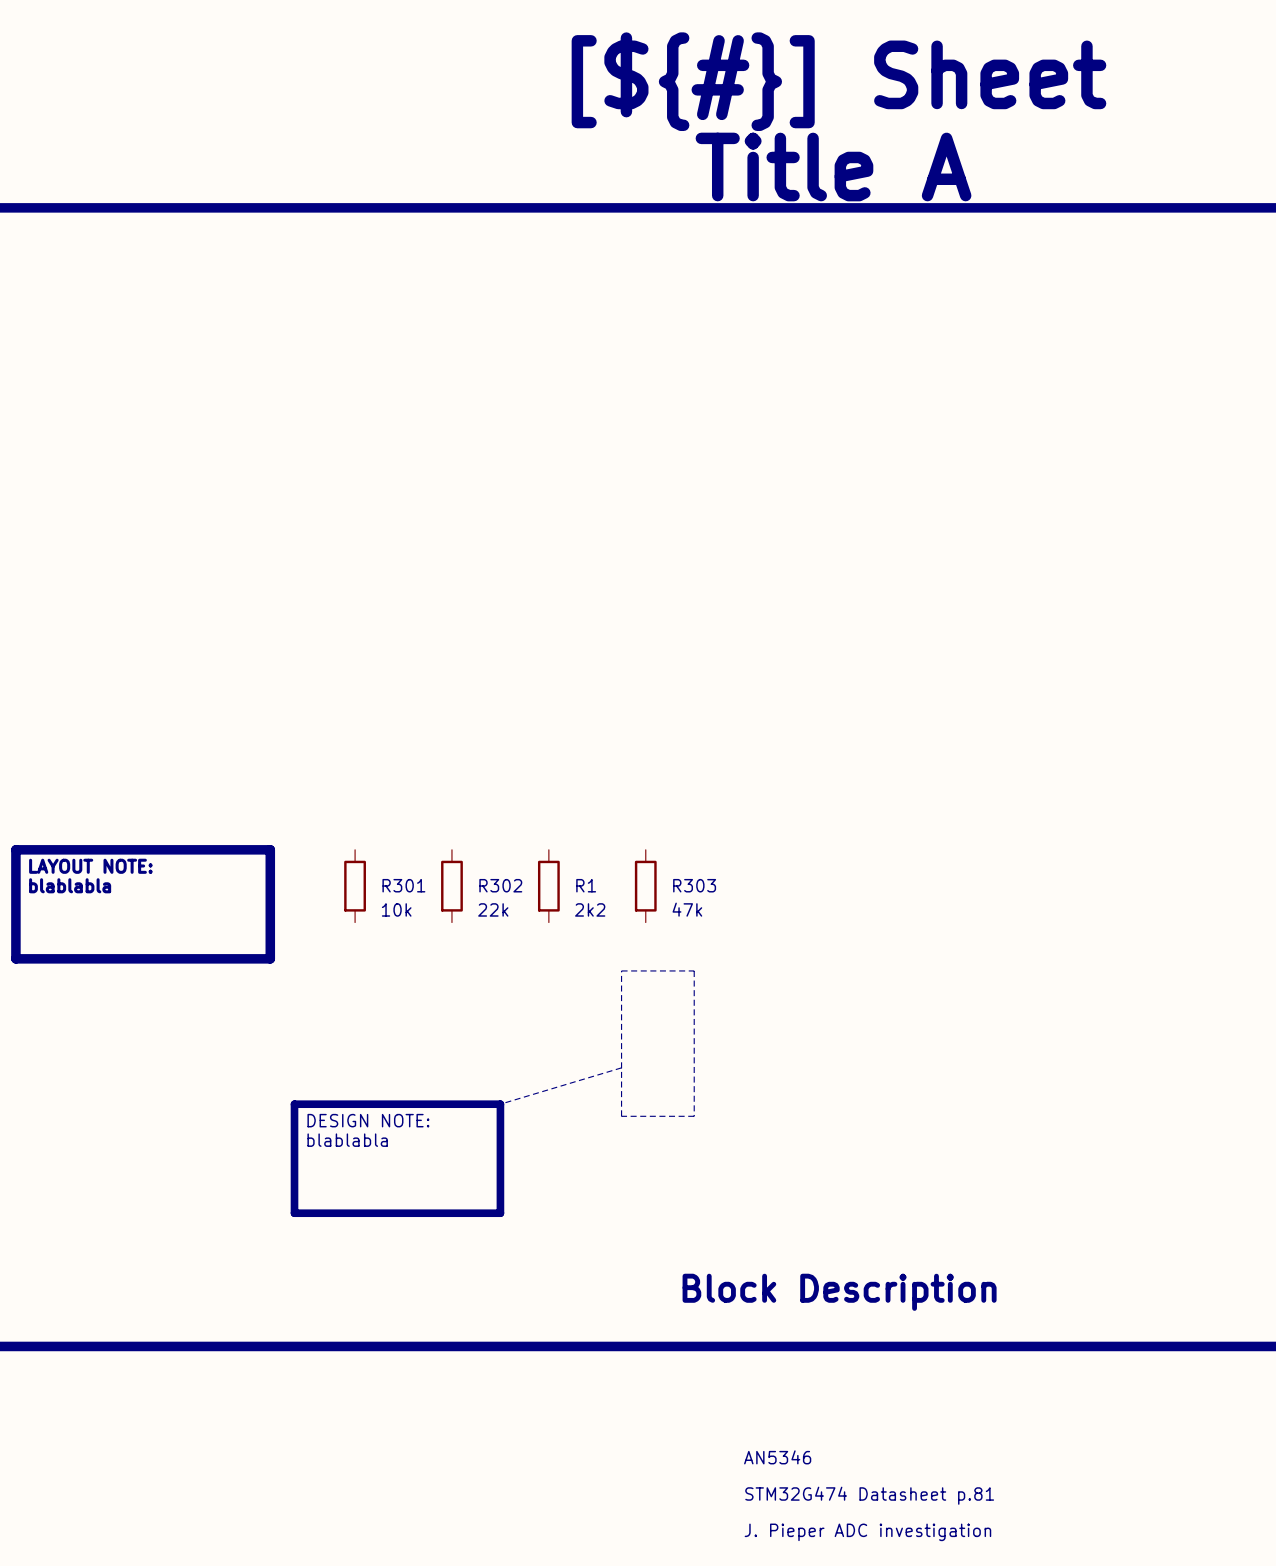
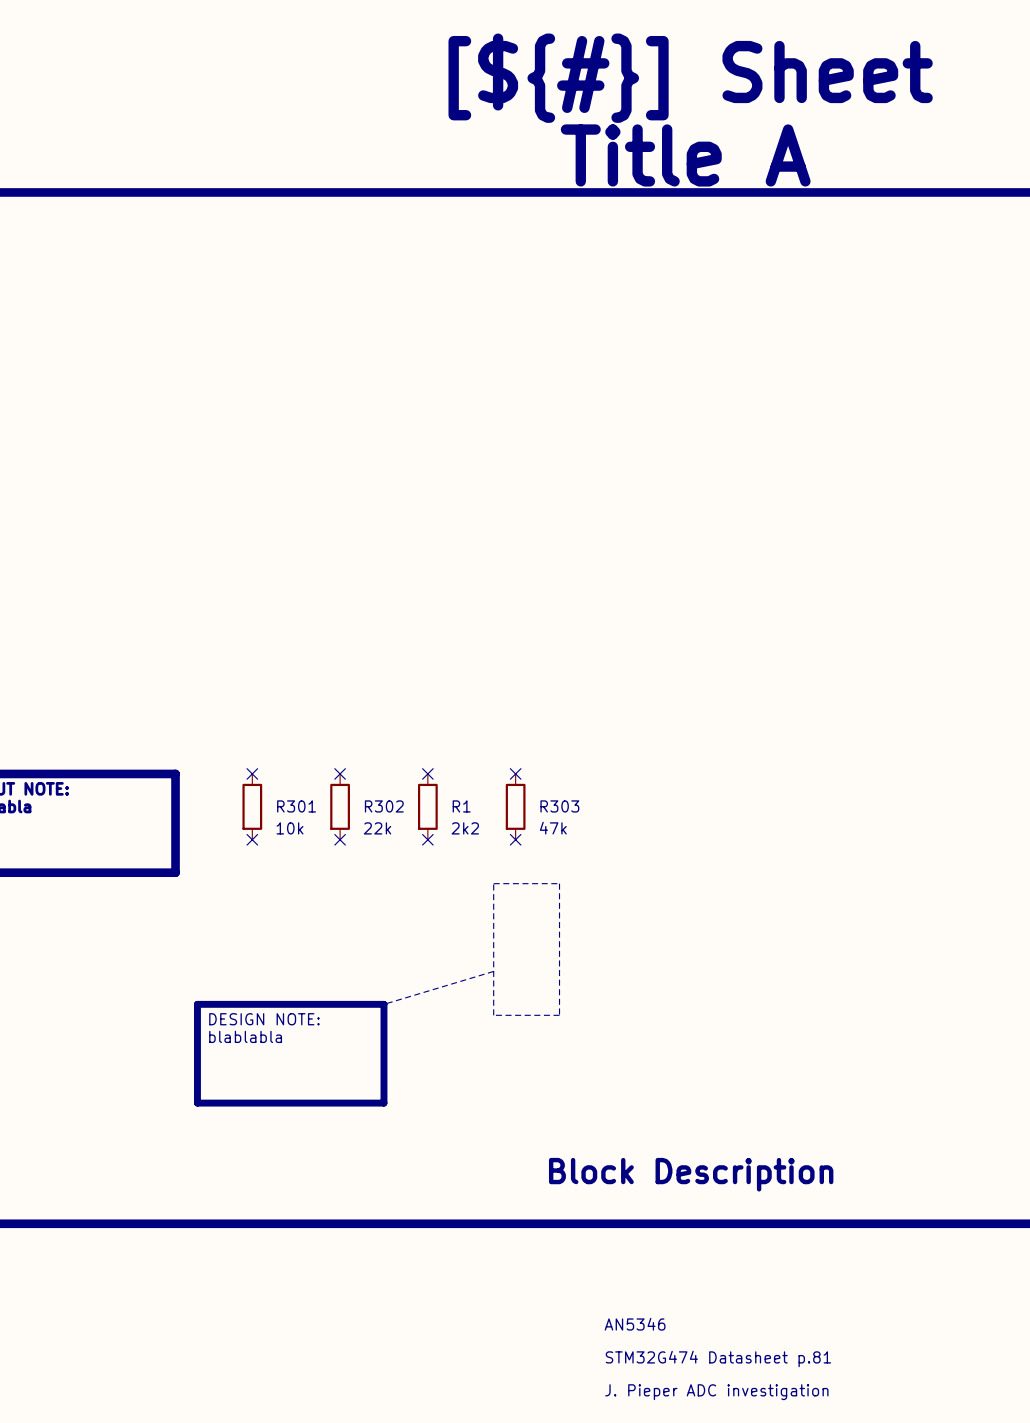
no-connect mark: none -> (252, 773)
no-connect mark: none -> (340, 773)
no-connect mark: none -> (427, 773)
no-connect mark: none -> (515, 773)
no-connect mark: none -> (252, 839)
no-connect mark: none -> (340, 839)
no-connect mark: none -> (427, 839)
no-connect mark: none -> (515, 839)

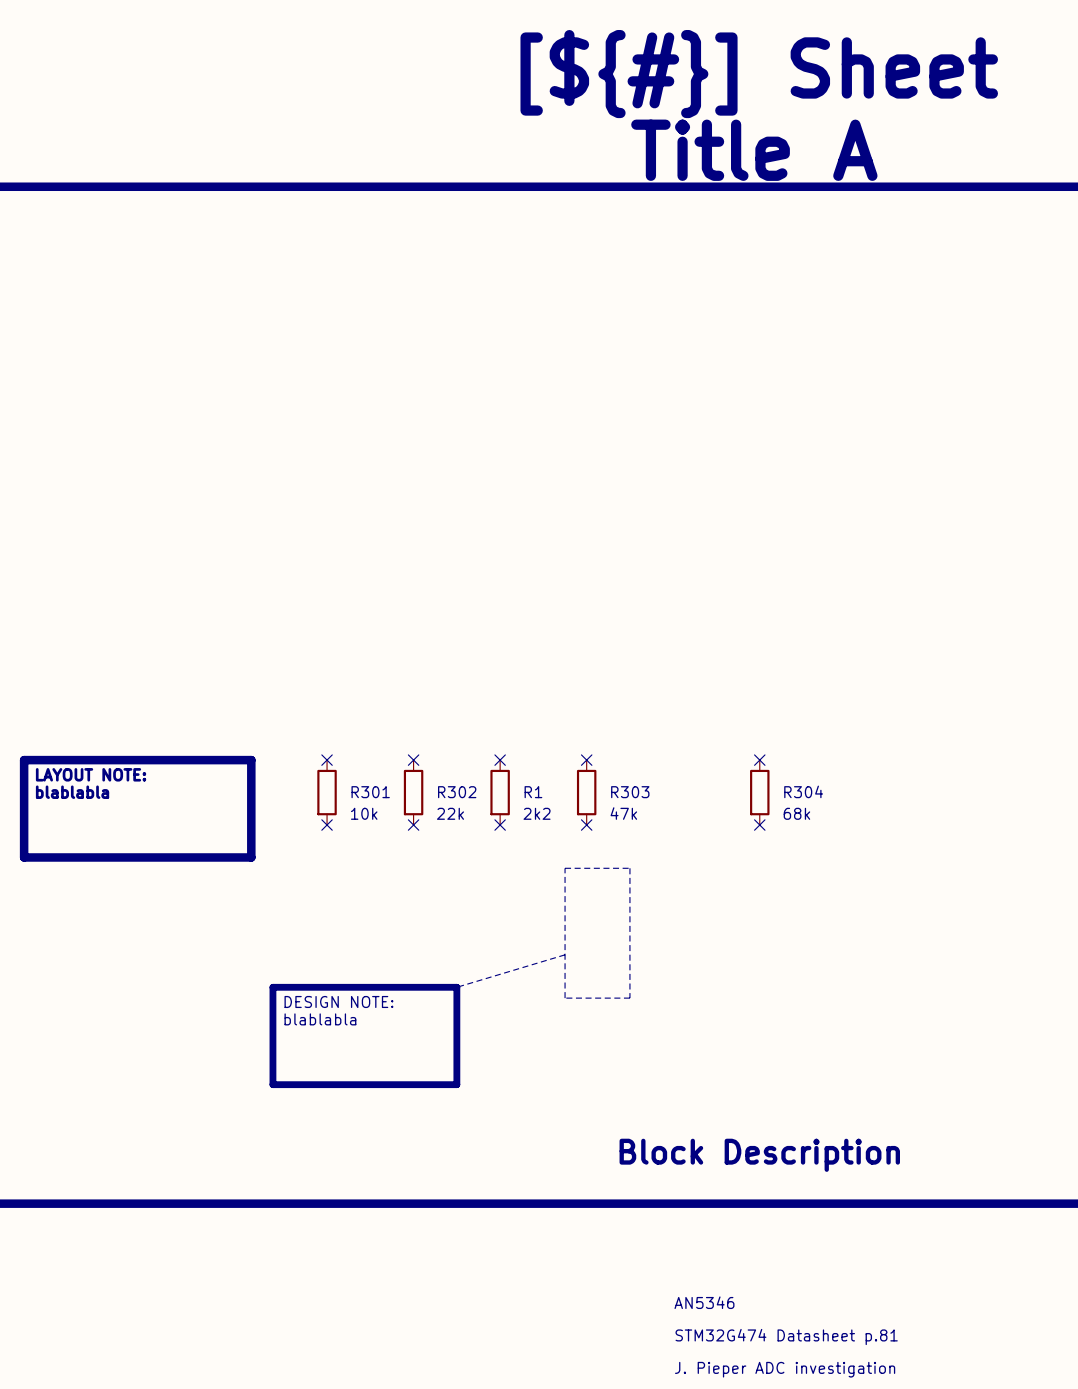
no-connect mark: none -> (759, 760)
R304: none -> 68k (759, 792)
no-connect mark: none -> (759, 825)

